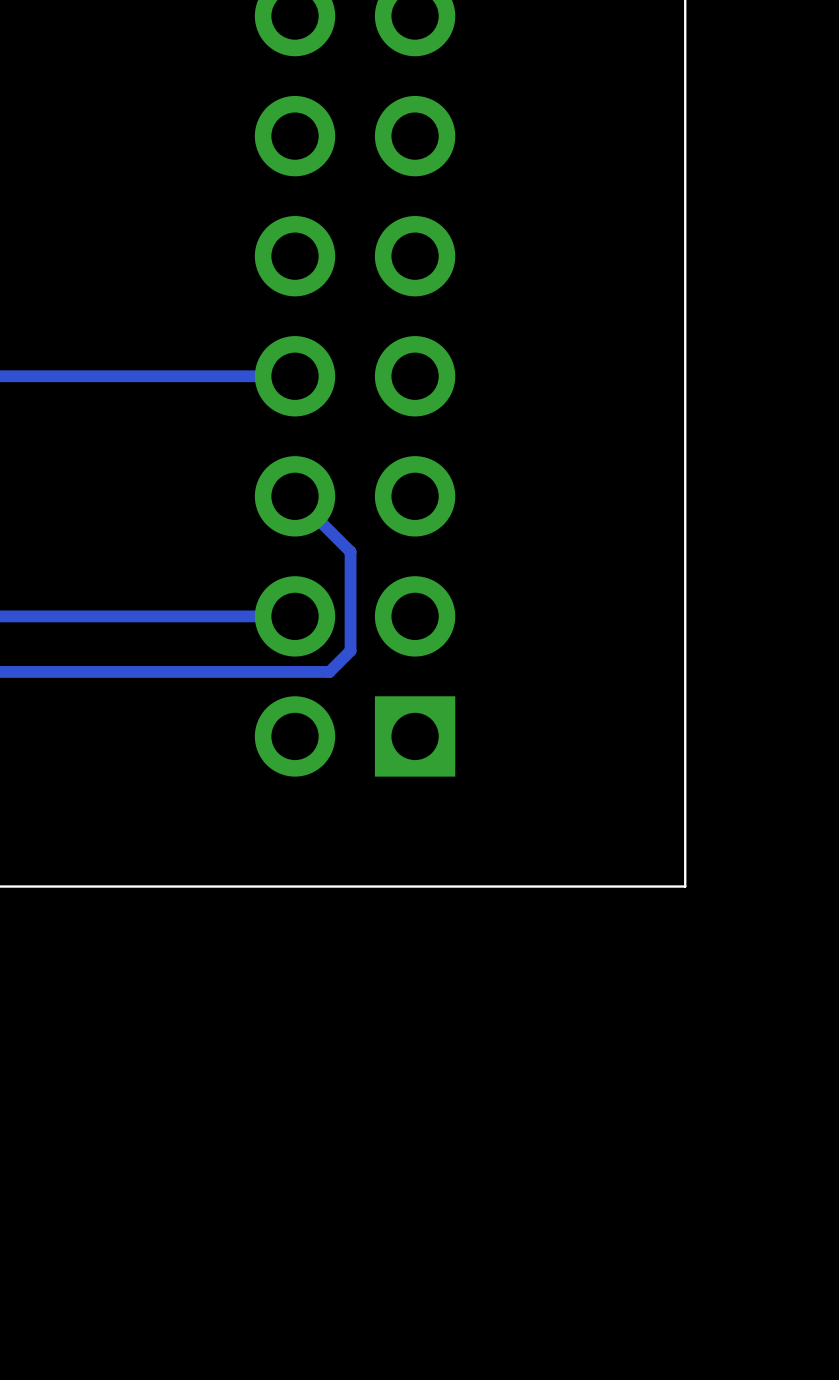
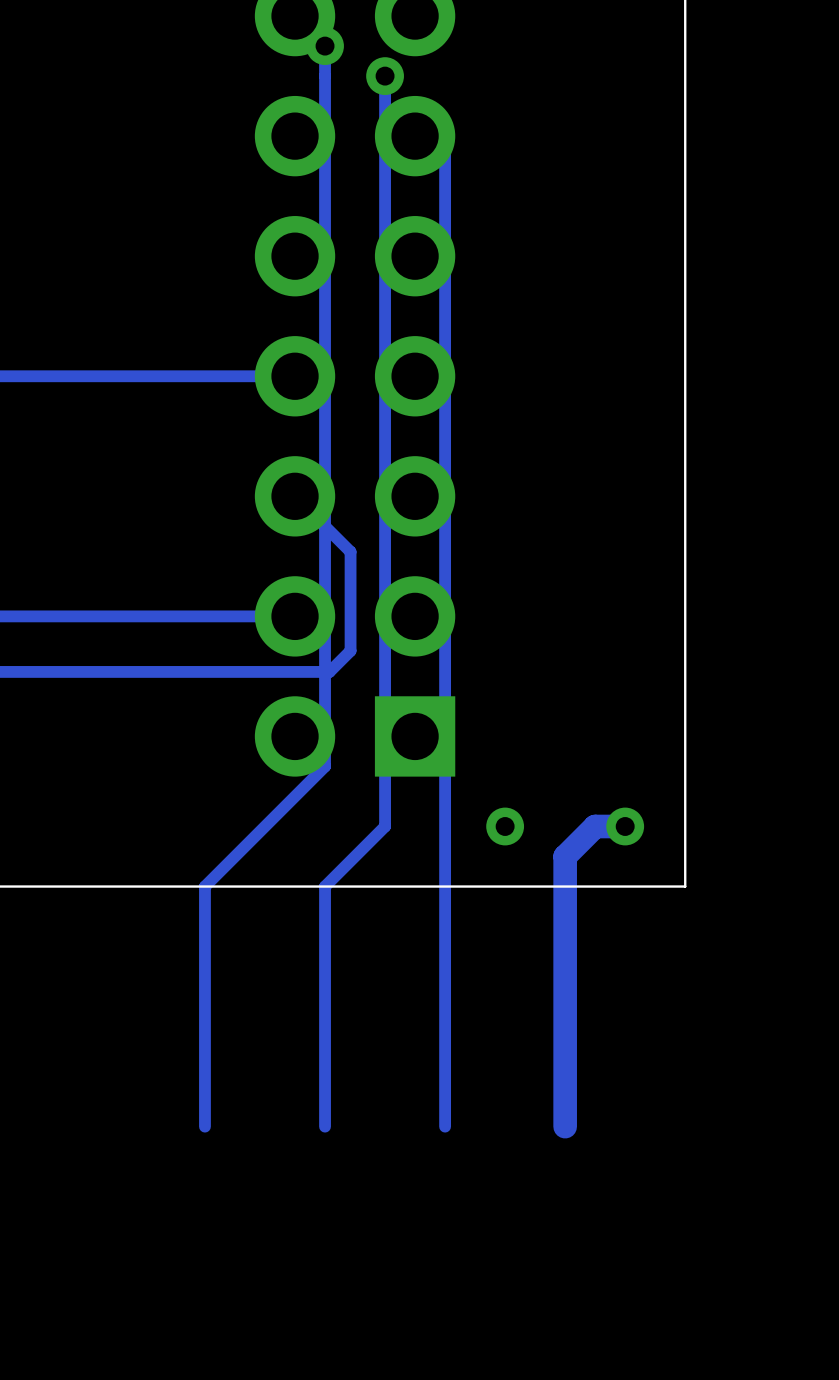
track: none -> (325, 46) (325, 766) (204, 886) (204, 1126)
via: none -> (325, 46)
track: none -> (385, 76) (385, 826) (325, 886) (325, 1126)
via: none -> (385, 76)
track: none -> (445, 136) (445, 1126)
via: none -> (505, 826)
track: none -> (625, 826) (595, 826) (565, 856) (565, 1126)
via: none -> (625, 826)

